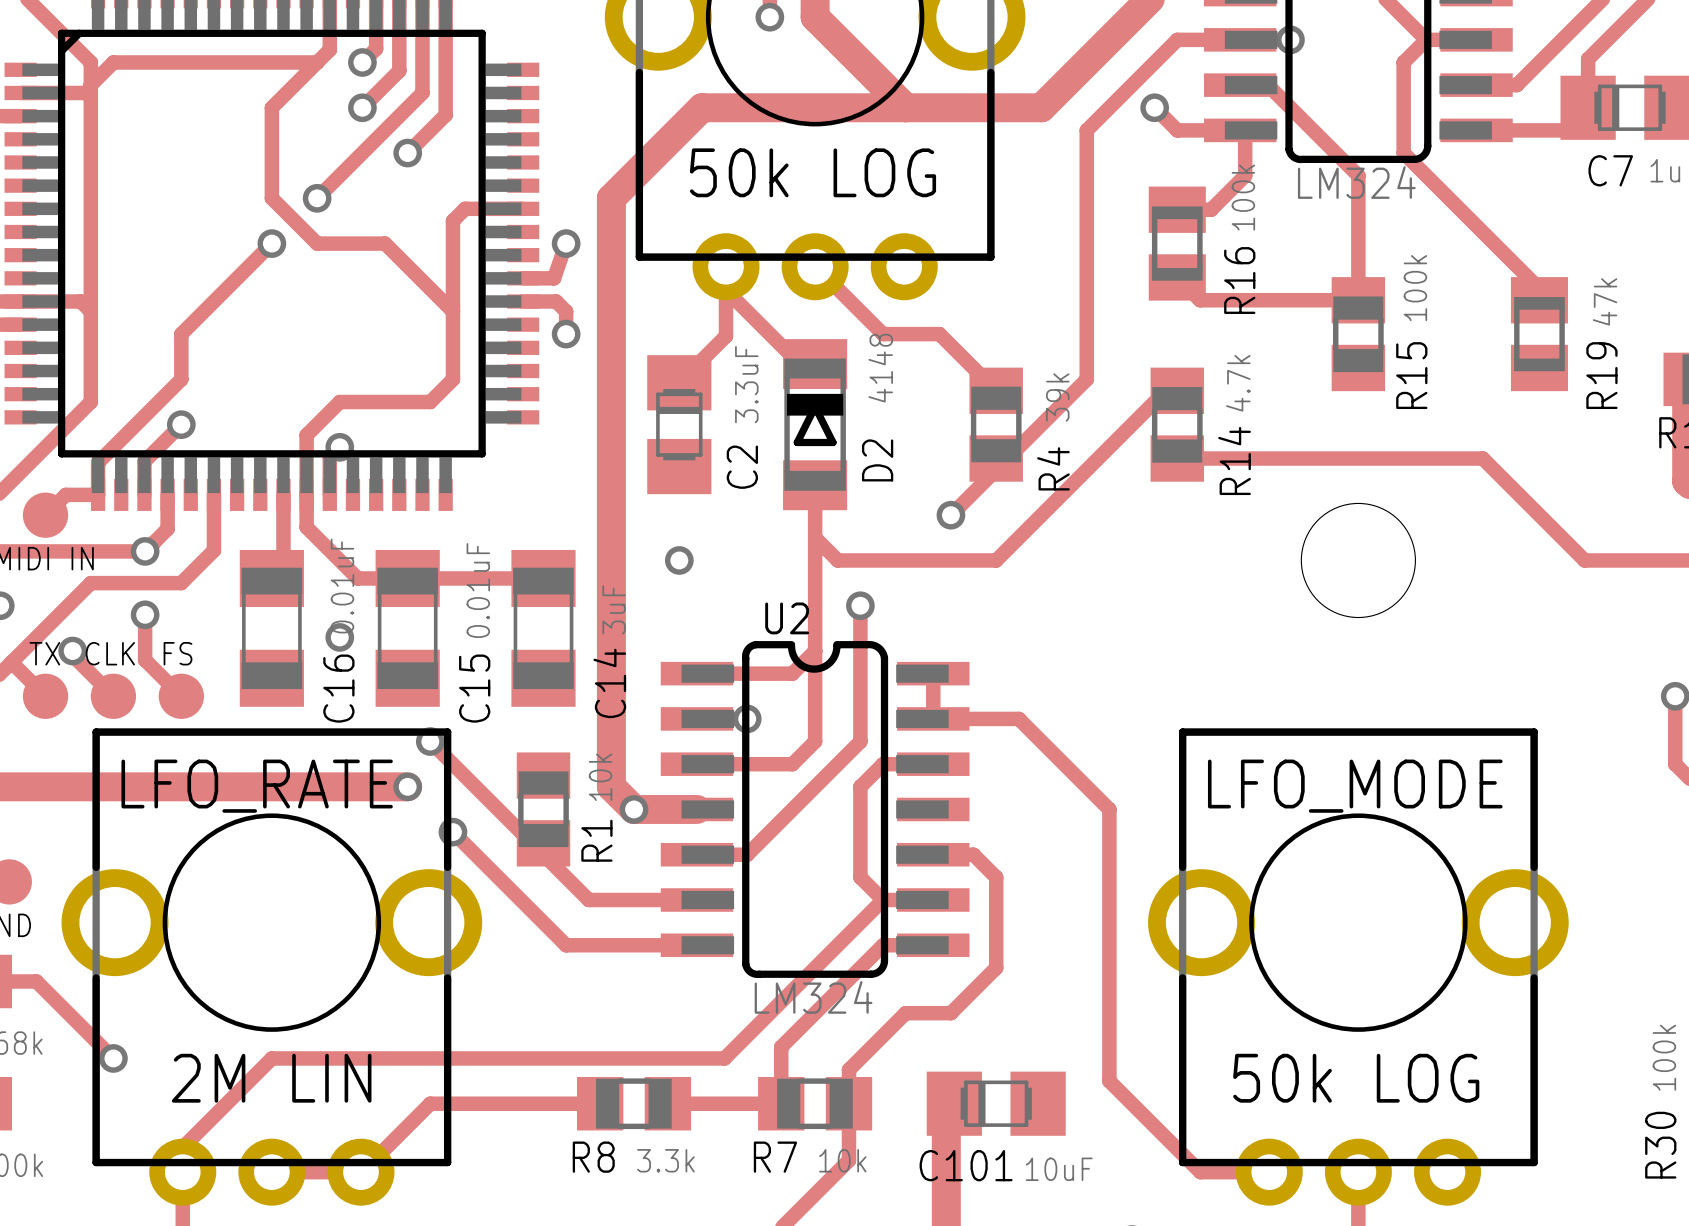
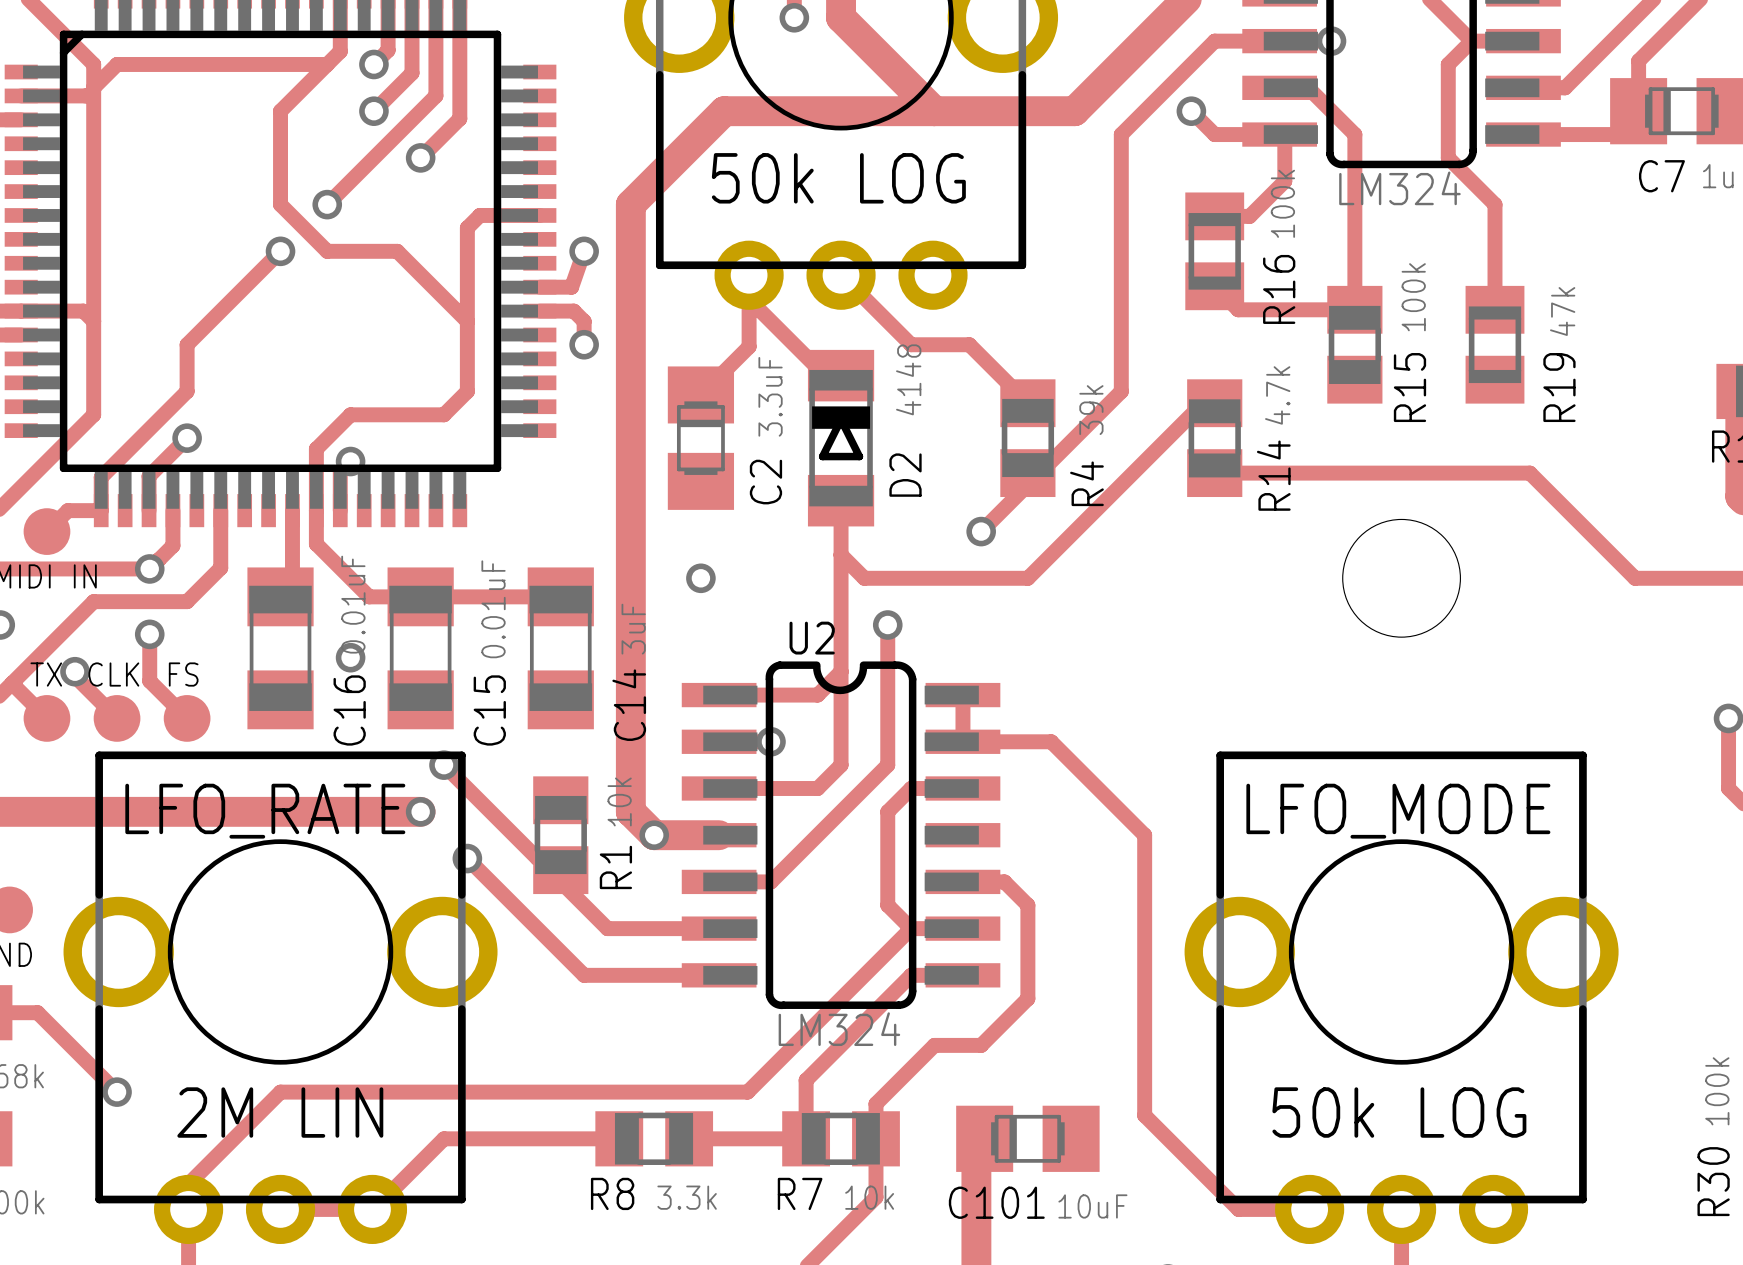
track: (1313, 130) (1358, 175) (1358, 300) (1313, 300) -> (1354, 134) (1354, 309)
track: (1448, 198) (1539, 288) (1539, 300) -> (1494, 204) (1494, 309)
R15 position: (1358, 334) -> (1354, 344)
R19 position: (1539, 334) -> (1494, 344)

